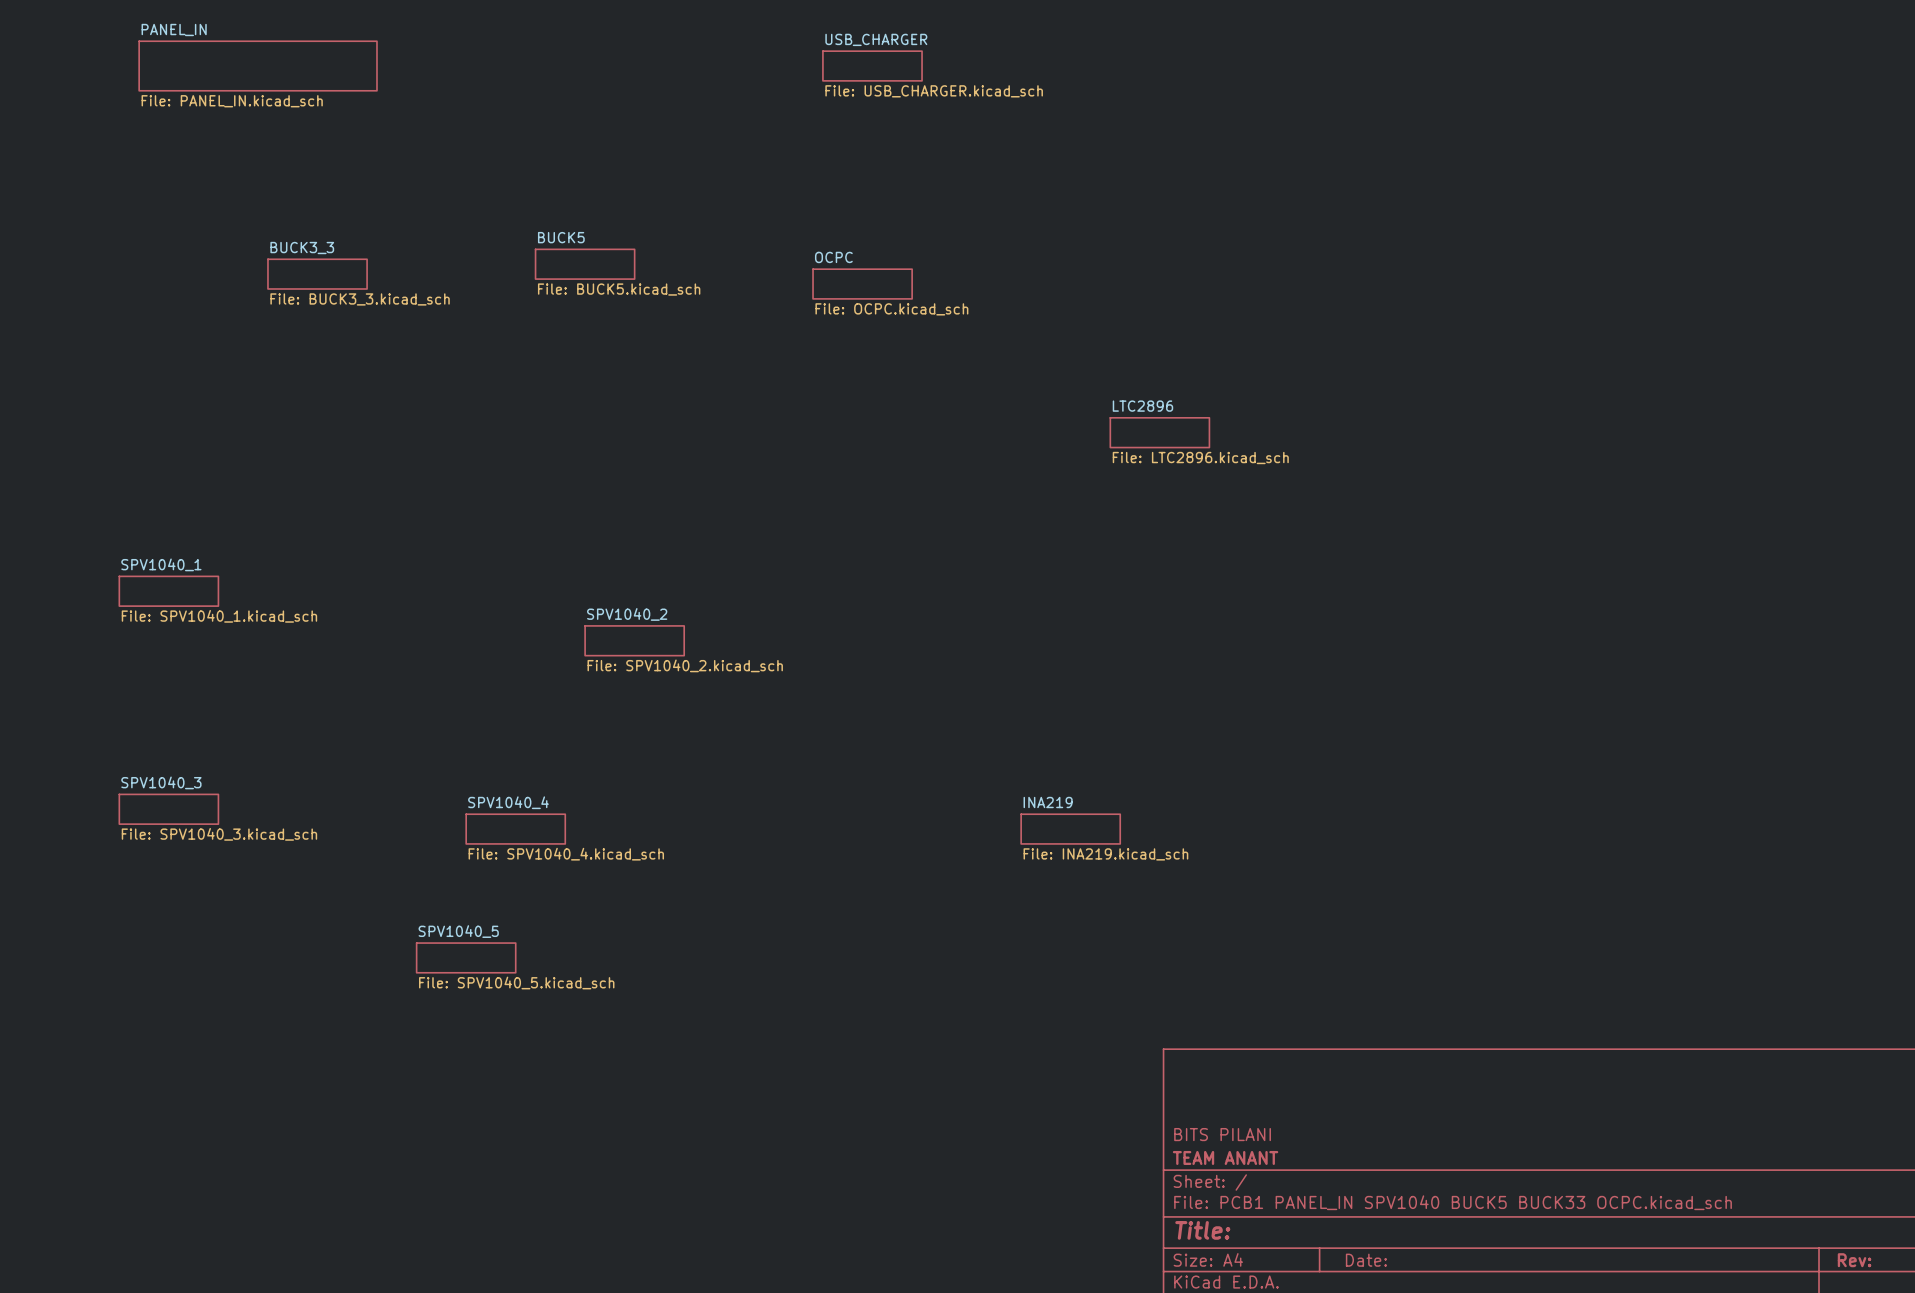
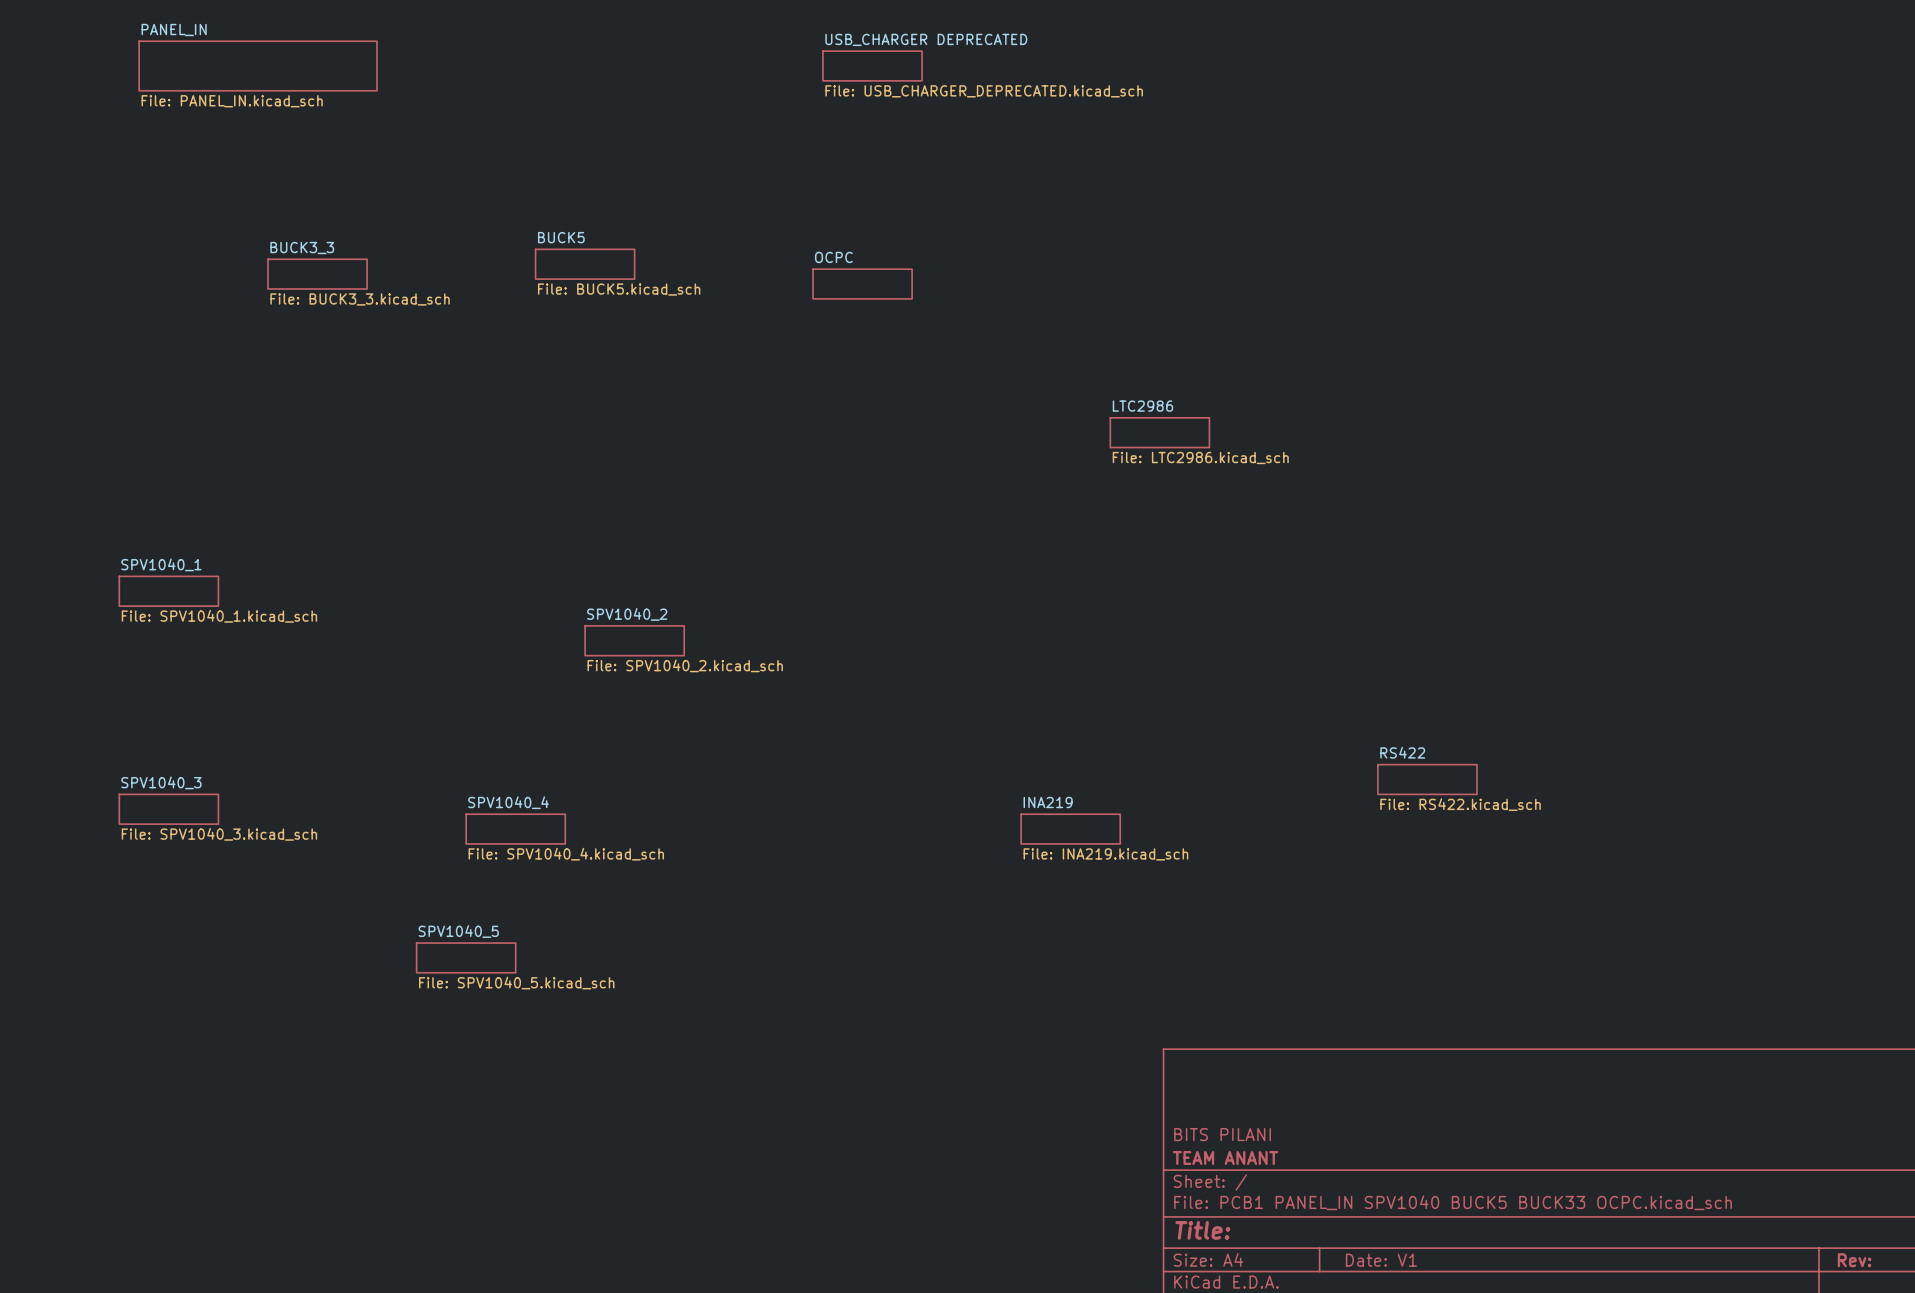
sheet USB_CHARGER name: USB_CHARGER (876, 39) -> USB_CHARGER DEPRECATED (926, 39)
sheet USB_CHARGER value: File: USB_CHARGER.kicad_sch (934, 91) -> File: USB_CHARGER_DEPRECATED.kicad_sch (984, 91)
sheet OCPC value: File: OCPC.kicad_sch (891, 309) -> none
sheet LTC2896 name: LTC2896 (1142, 406) -> LTC2986 (1142, 406)
sheet LTC2896 value: File: LTC2896.kicad_sch (1200, 458) -> File: LTC2986.kicad_sch (1200, 458)
sheet RS422: none -> File: RS422.kicad_sch (1427, 779)
title block: Date: (1366, 1260) -> Date: V1 (1381, 1260)

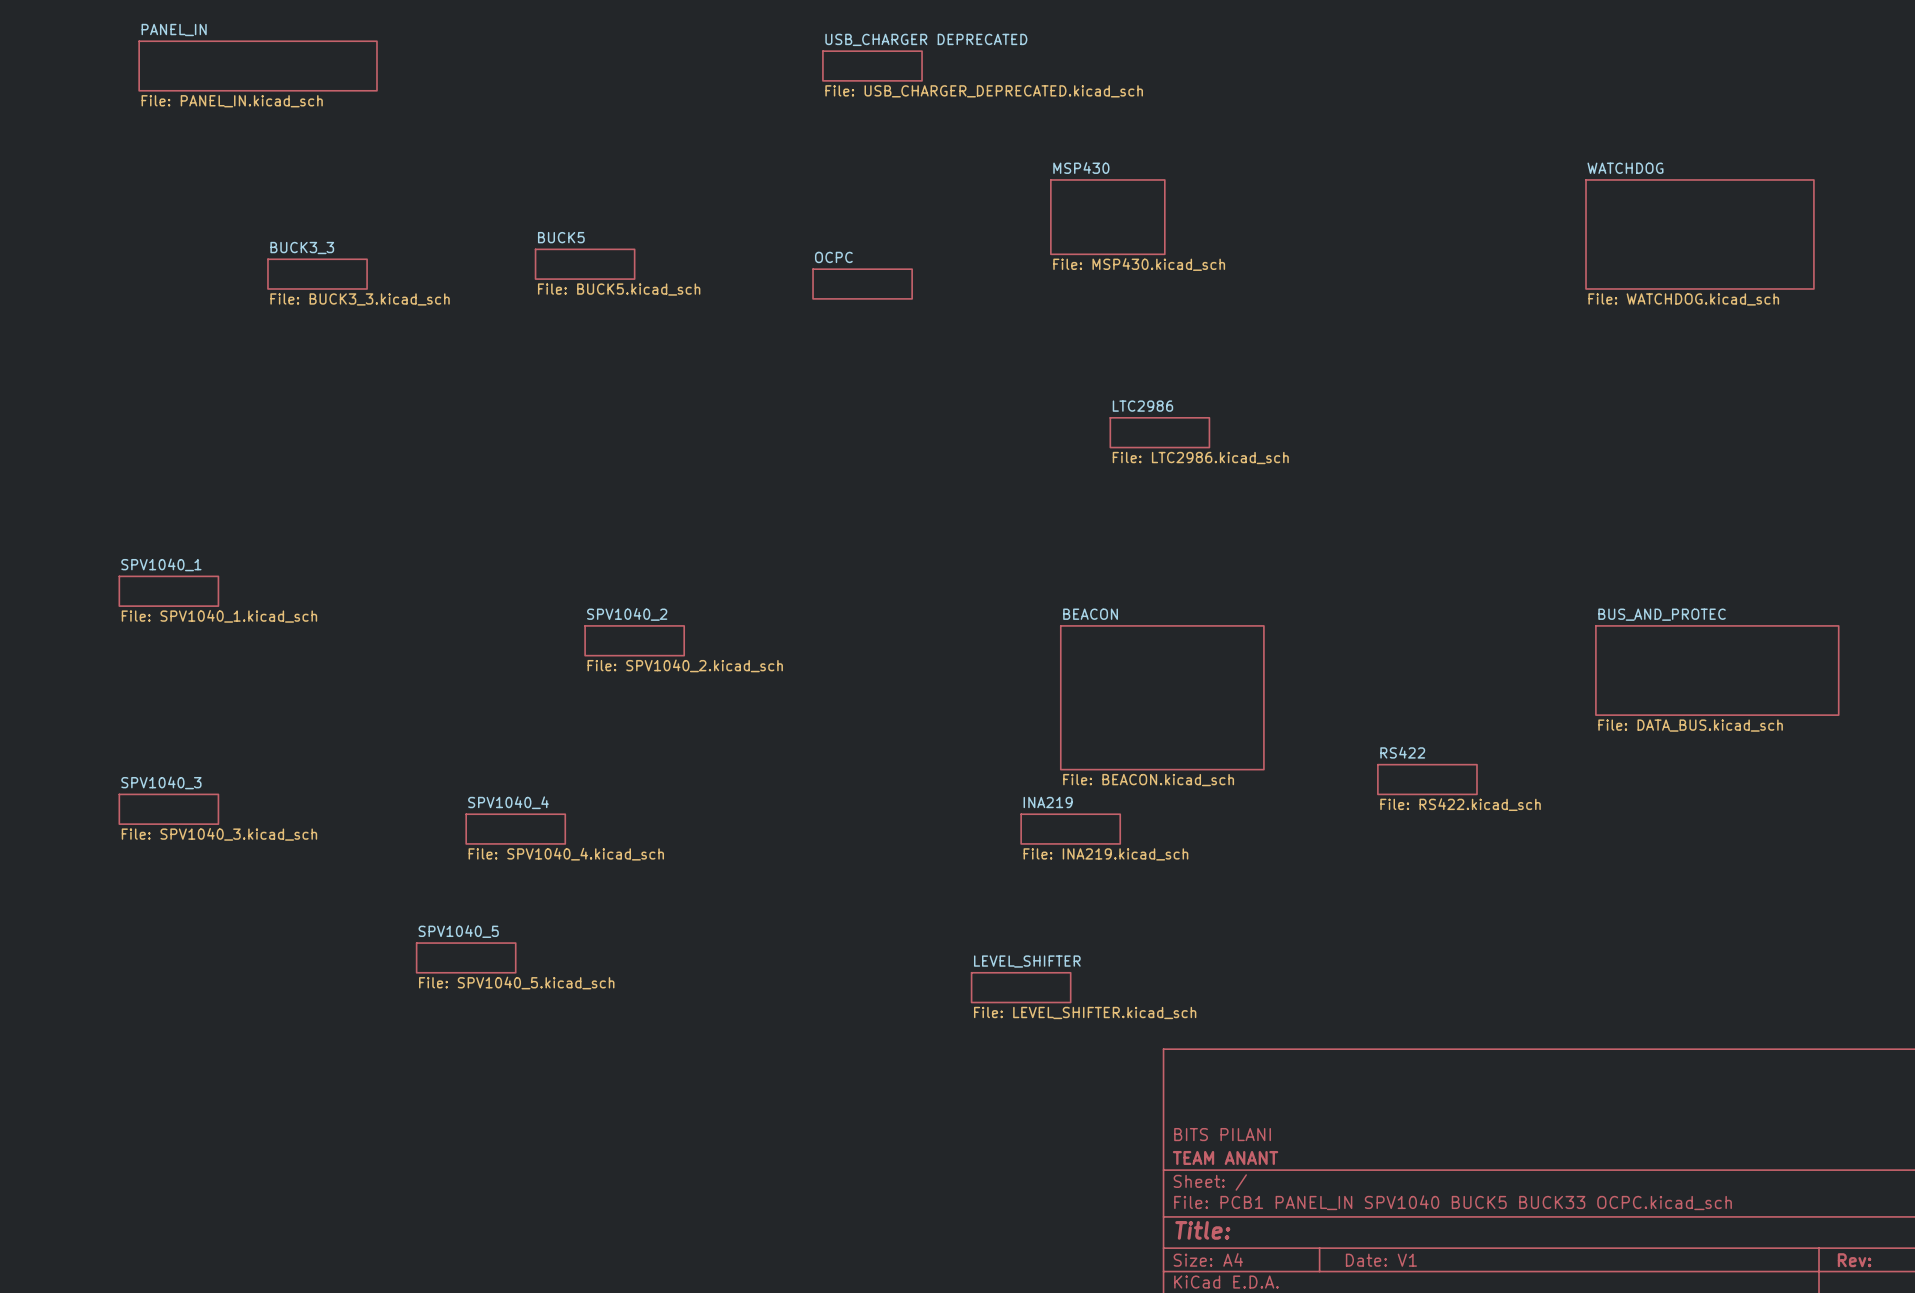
sheet MSP430: none -> File: MSP430.kicad_sch (1107, 217)
sheet WATCHDOG: none -> File: WATCHDOG.kicad_sch (1699, 234)
sheet BUS_AND_PROTEC: none -> File: DATA_BUS.kicad_sch (1717, 670)
sheet BEACON: none -> File: BEACON.kicad_sch (1162, 697)
sheet LEVEL_SHIFTER: none -> File: LEVEL_SHIFTER.kicad_sch (1021, 987)

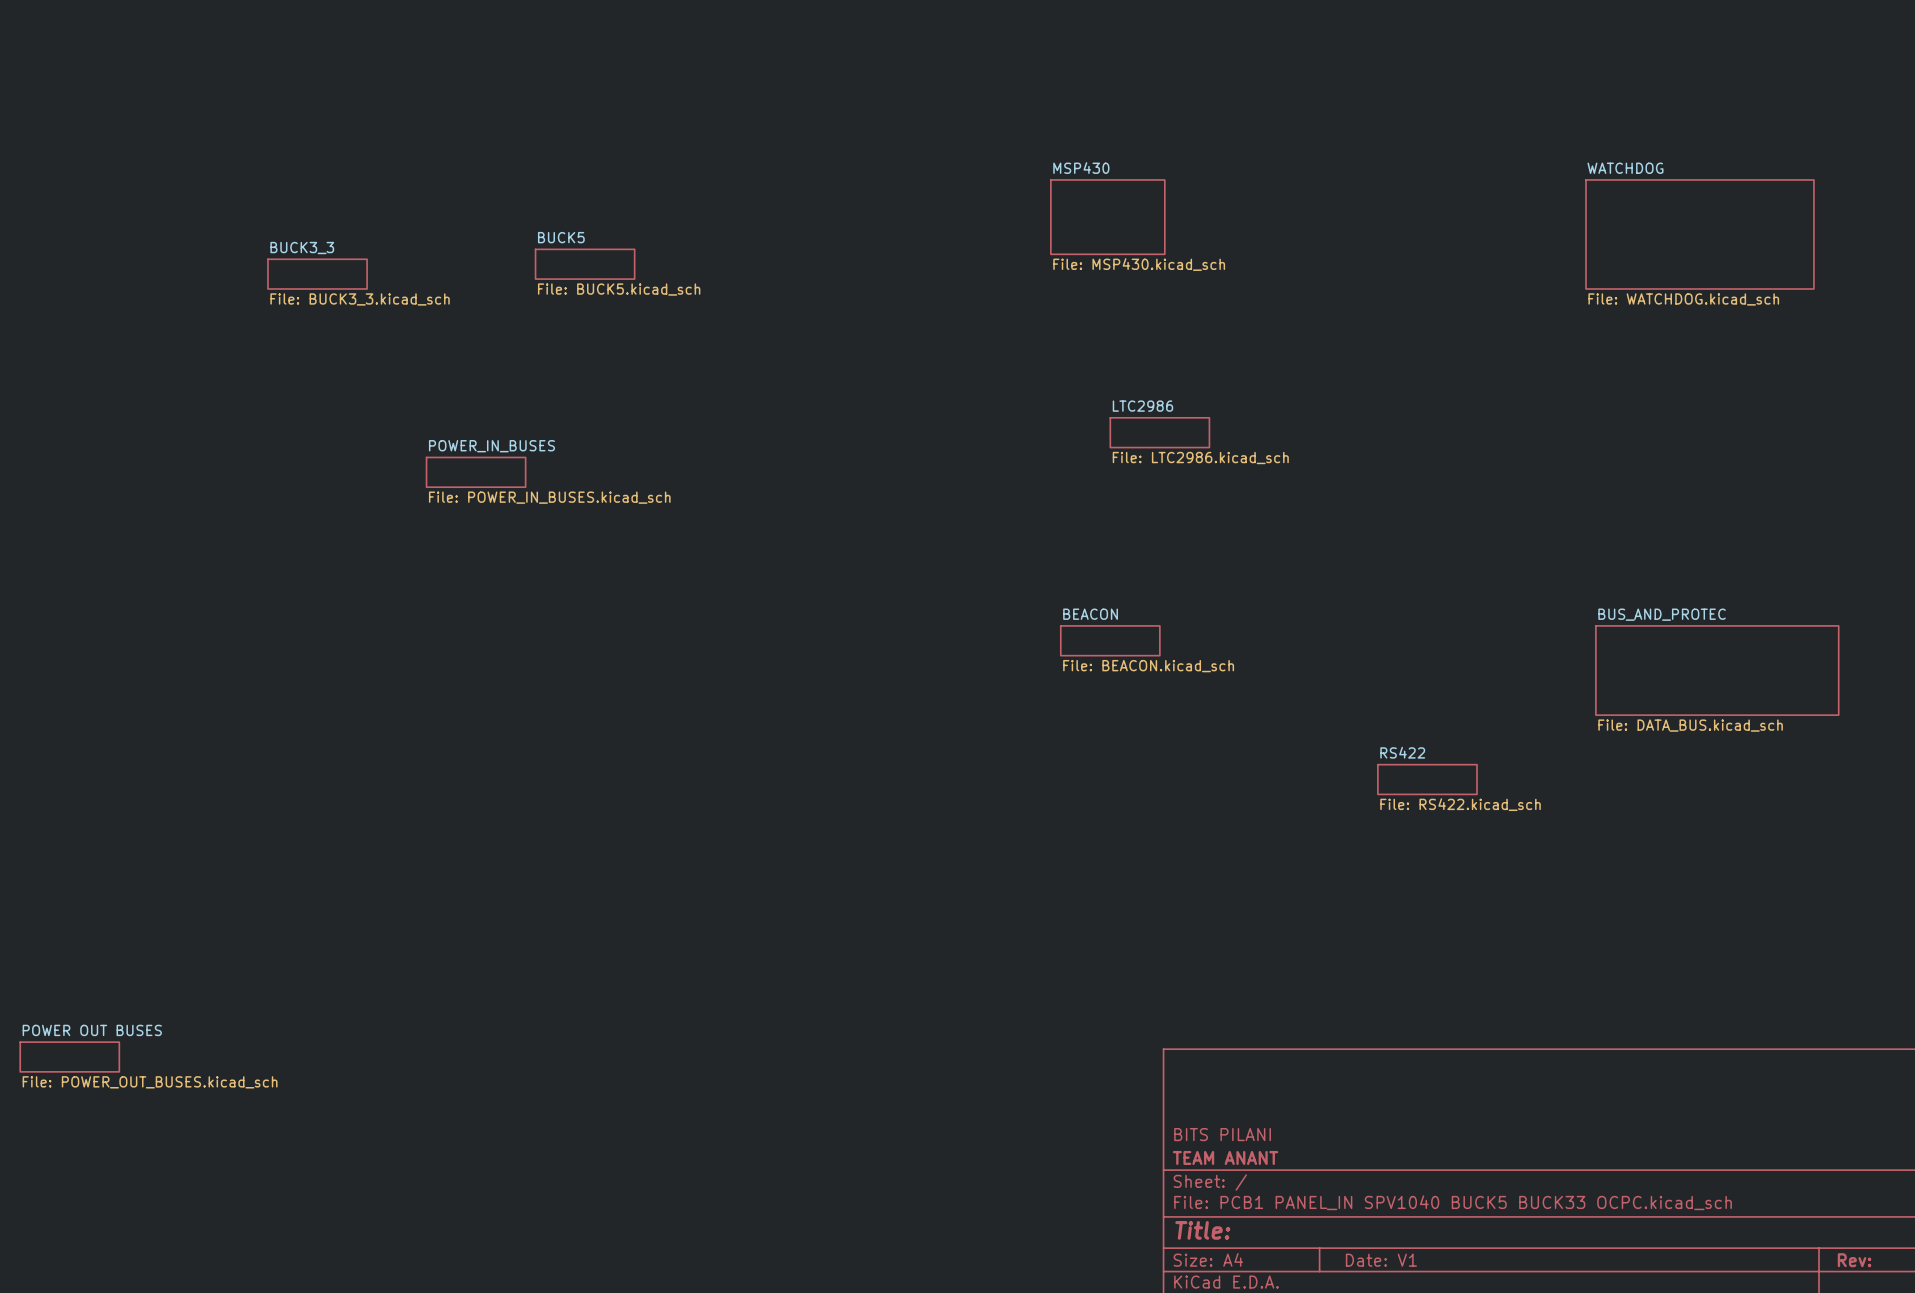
sheet PANEL_IN: File: PANEL_IN.kicad_sch (258, 66) -> none
sheet USB_CHARGER DEPRECATED: File: USB_CHARGER_DEPRECATED.kicad_sch (872, 66) -> none
sheet OCPC: (862, 284) -> none
sheet POWER_IN_BUSES: none -> File: POWER_IN_BUSES.kicad_sch (476, 472)
sheet SPV1040_1: File: SPV1040_1.kicad_sch (168, 591) -> none
sheet SPV1040_2: File: SPV1040_2.kicad_sch (634, 640) -> none
sheet BEACON: none -> File: BEACON.kicad_sch (1110, 640)
sheet BEACON: File: BEACON.kicad_sch (1162, 697) -> none
sheet SPV1040_3: File: SPV1040_3.kicad_sch (168, 809) -> none
sheet SPV1040_4: File: SPV1040_4.kicad_sch (515, 829) -> none
sheet INA219: File: INA219.kicad_sch (1070, 829) -> none
sheet SPV1040_5: File: SPV1040_5.kicad_sch (466, 957) -> none
sheet LEVEL_SHIFTER: File: LEVEL_SHIFTER.kicad_sch (1021, 987) -> none
sheet POWER OUT BUSES: none -> File: POWER_OUT_BUSES.kicad_sch (69, 1057)

